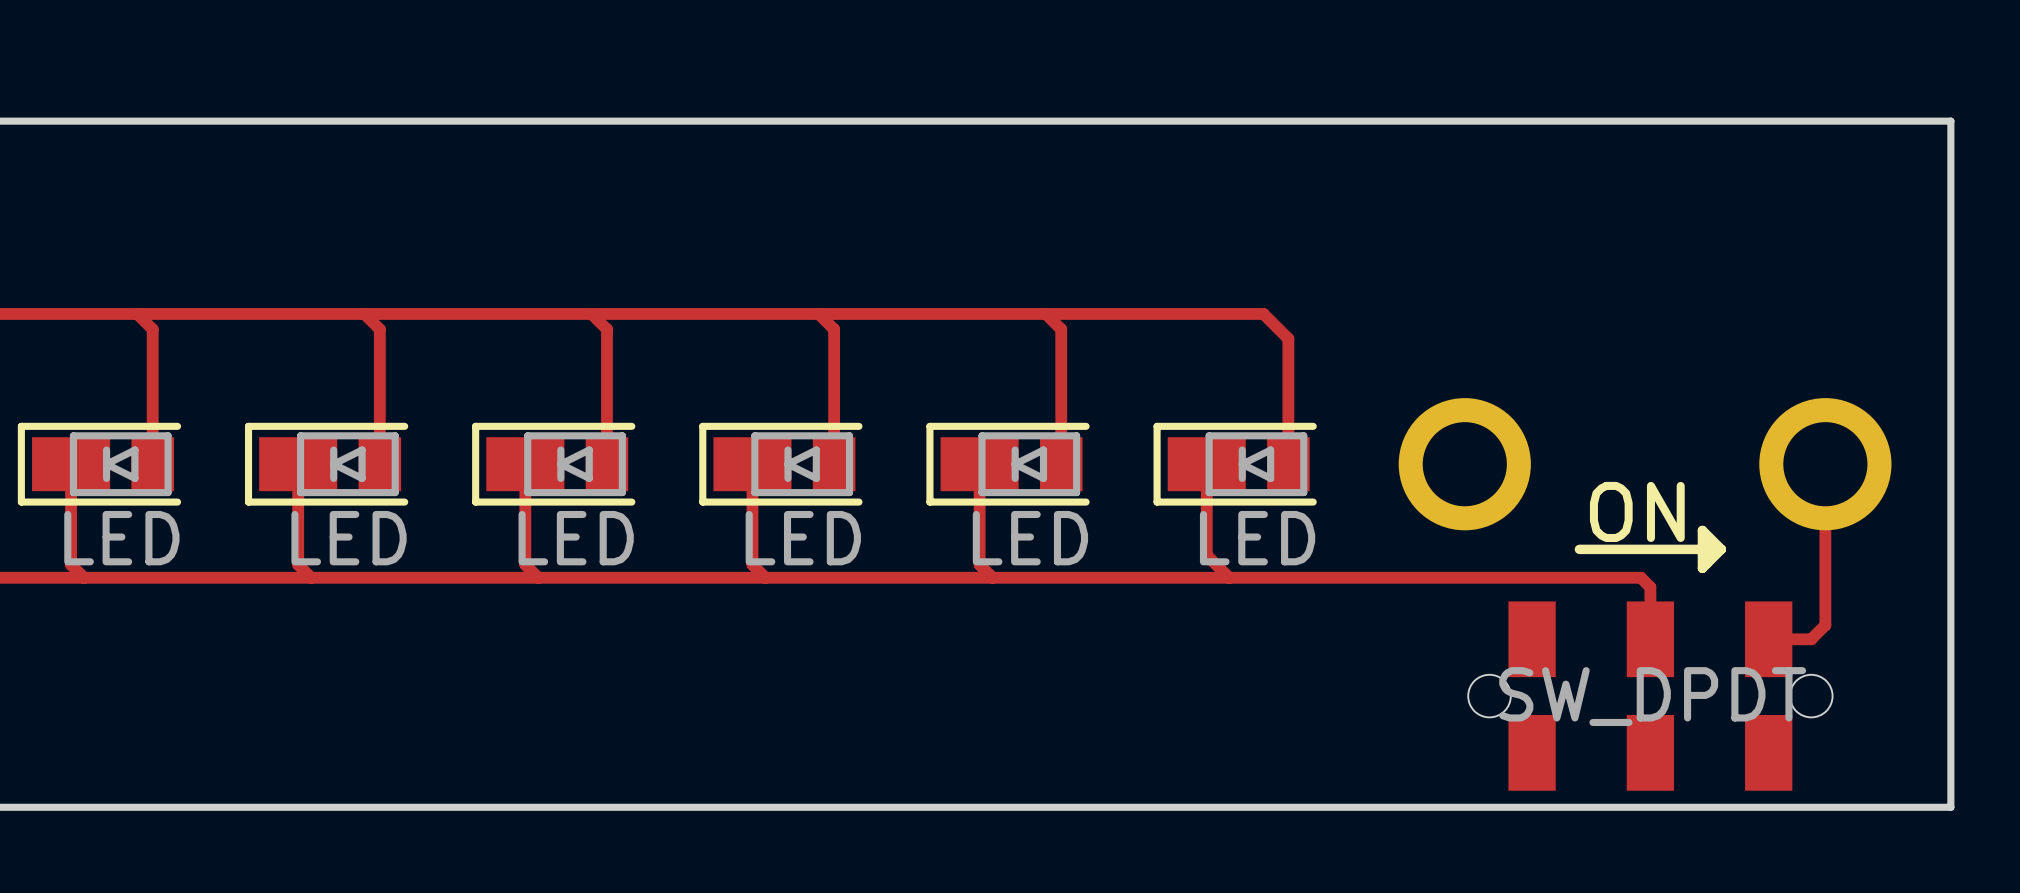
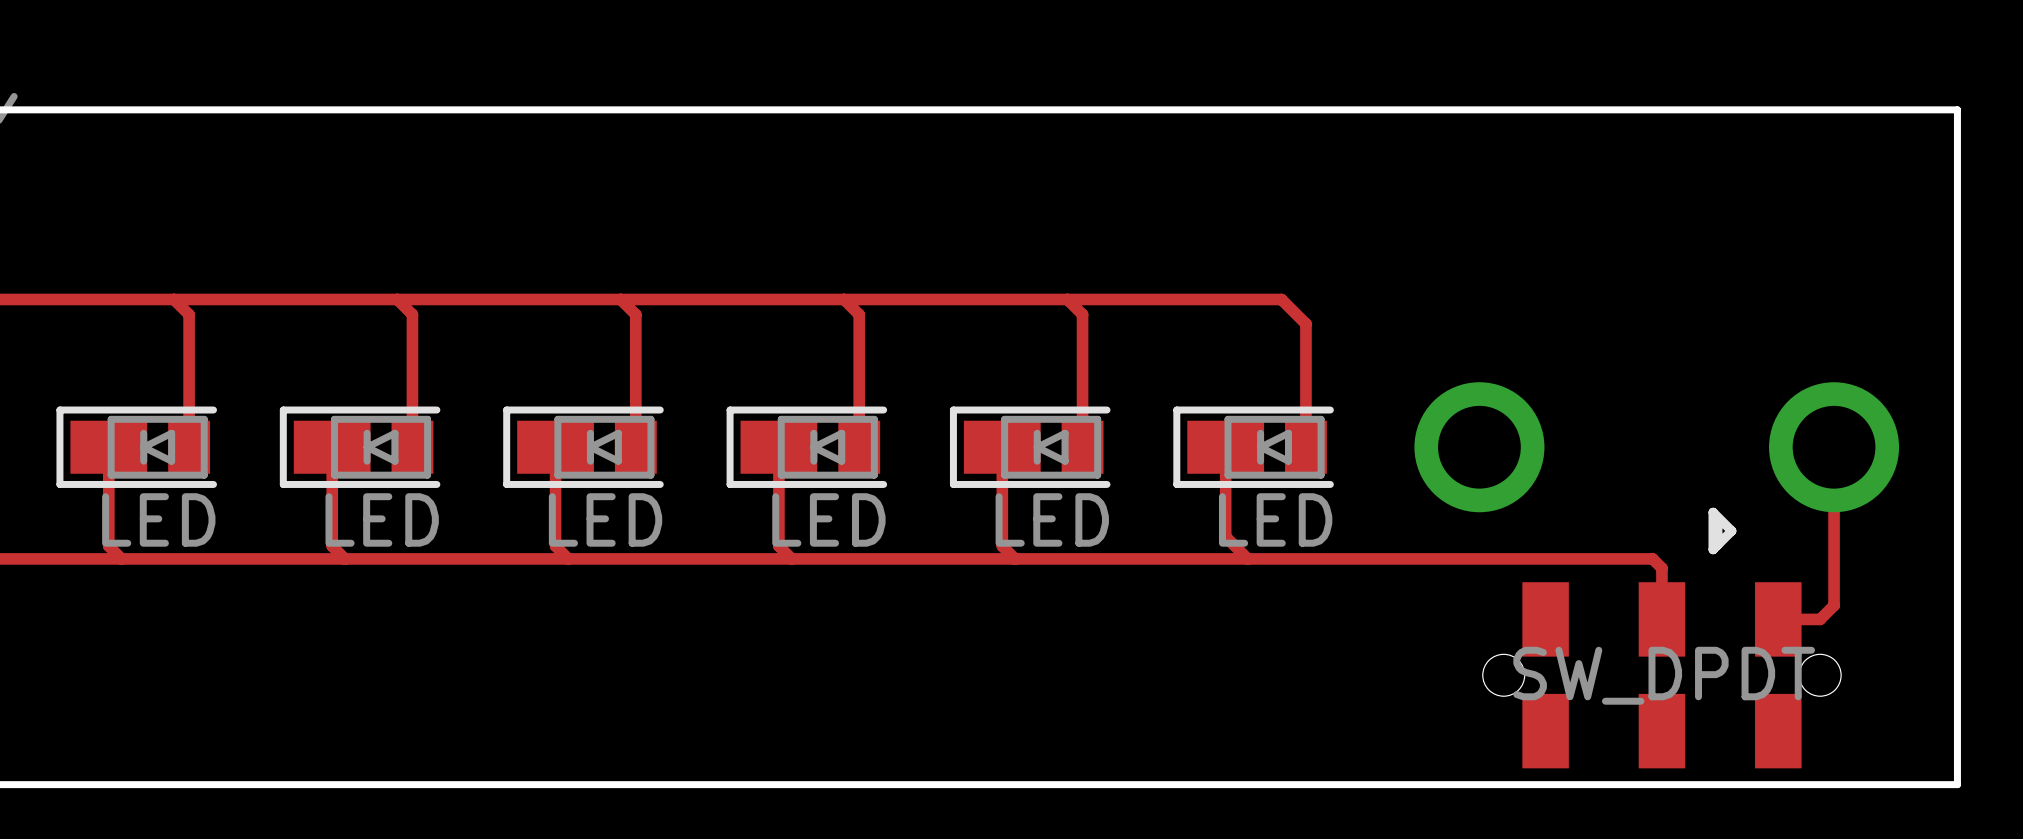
text: ON (1637, 511) -> none
line: (1579, 549) (1721, 549) -> none

